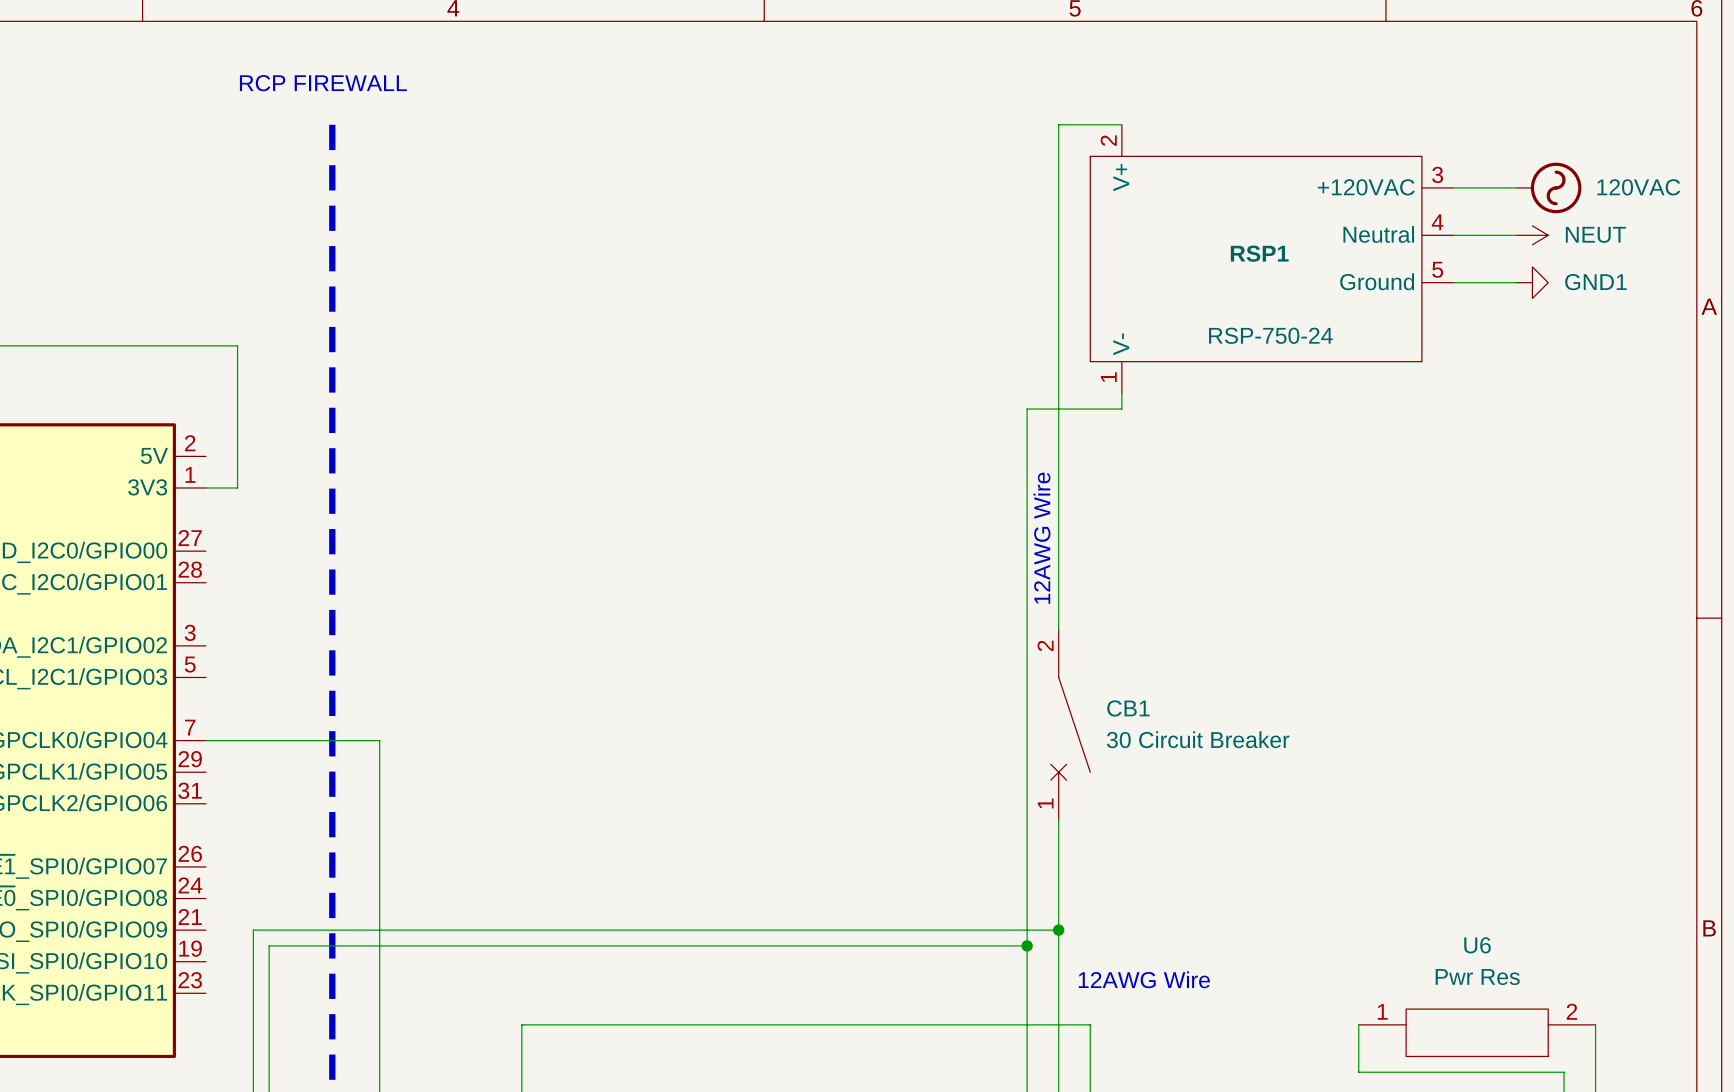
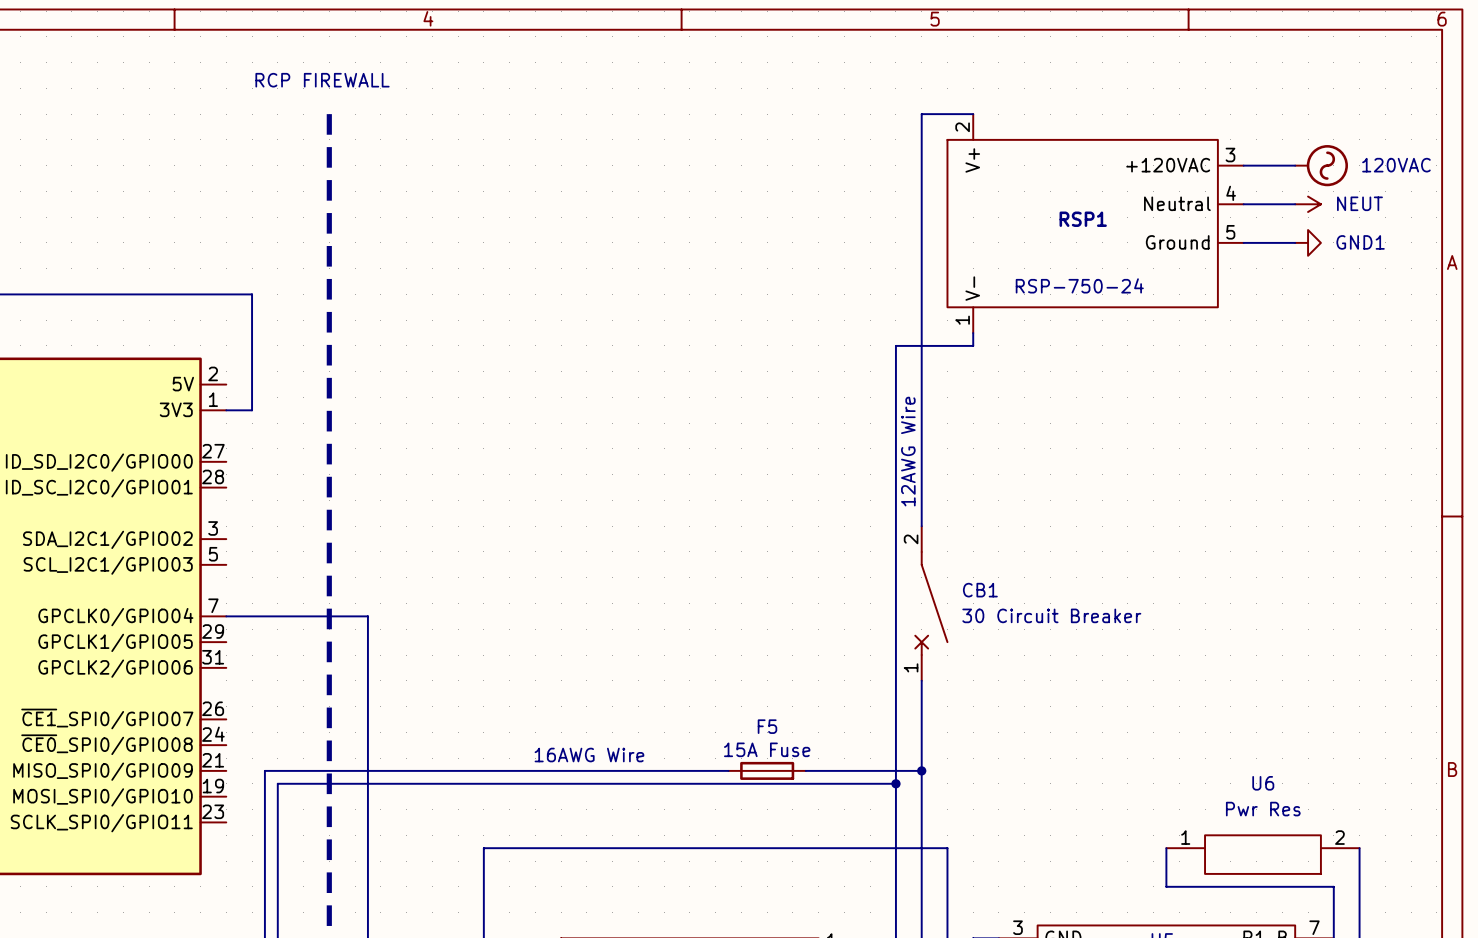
text: none -> 16AWG Wire (589, 755)
F5: none -> 15A Fuse (767, 770)
text: 12AWG Wire (1144, 979) -> none

